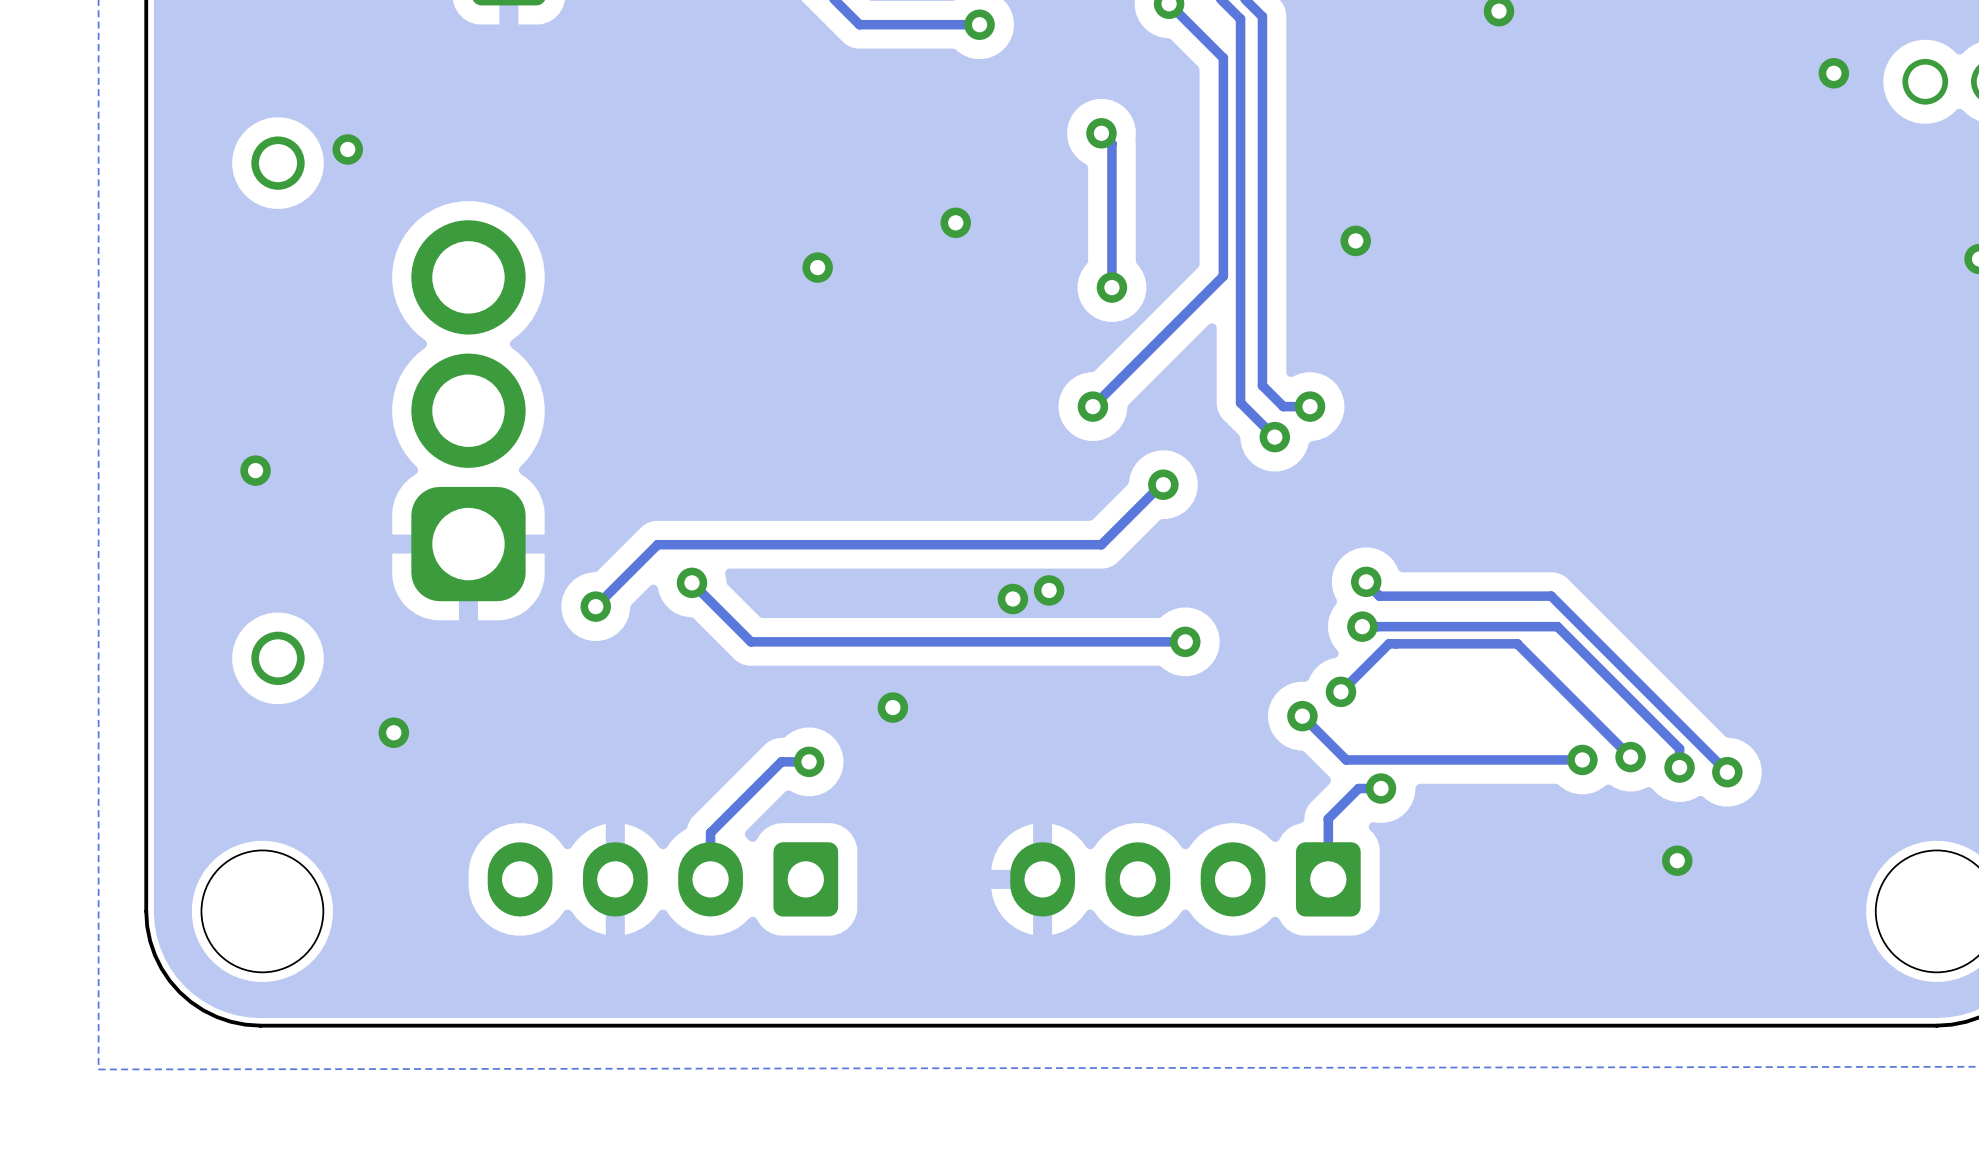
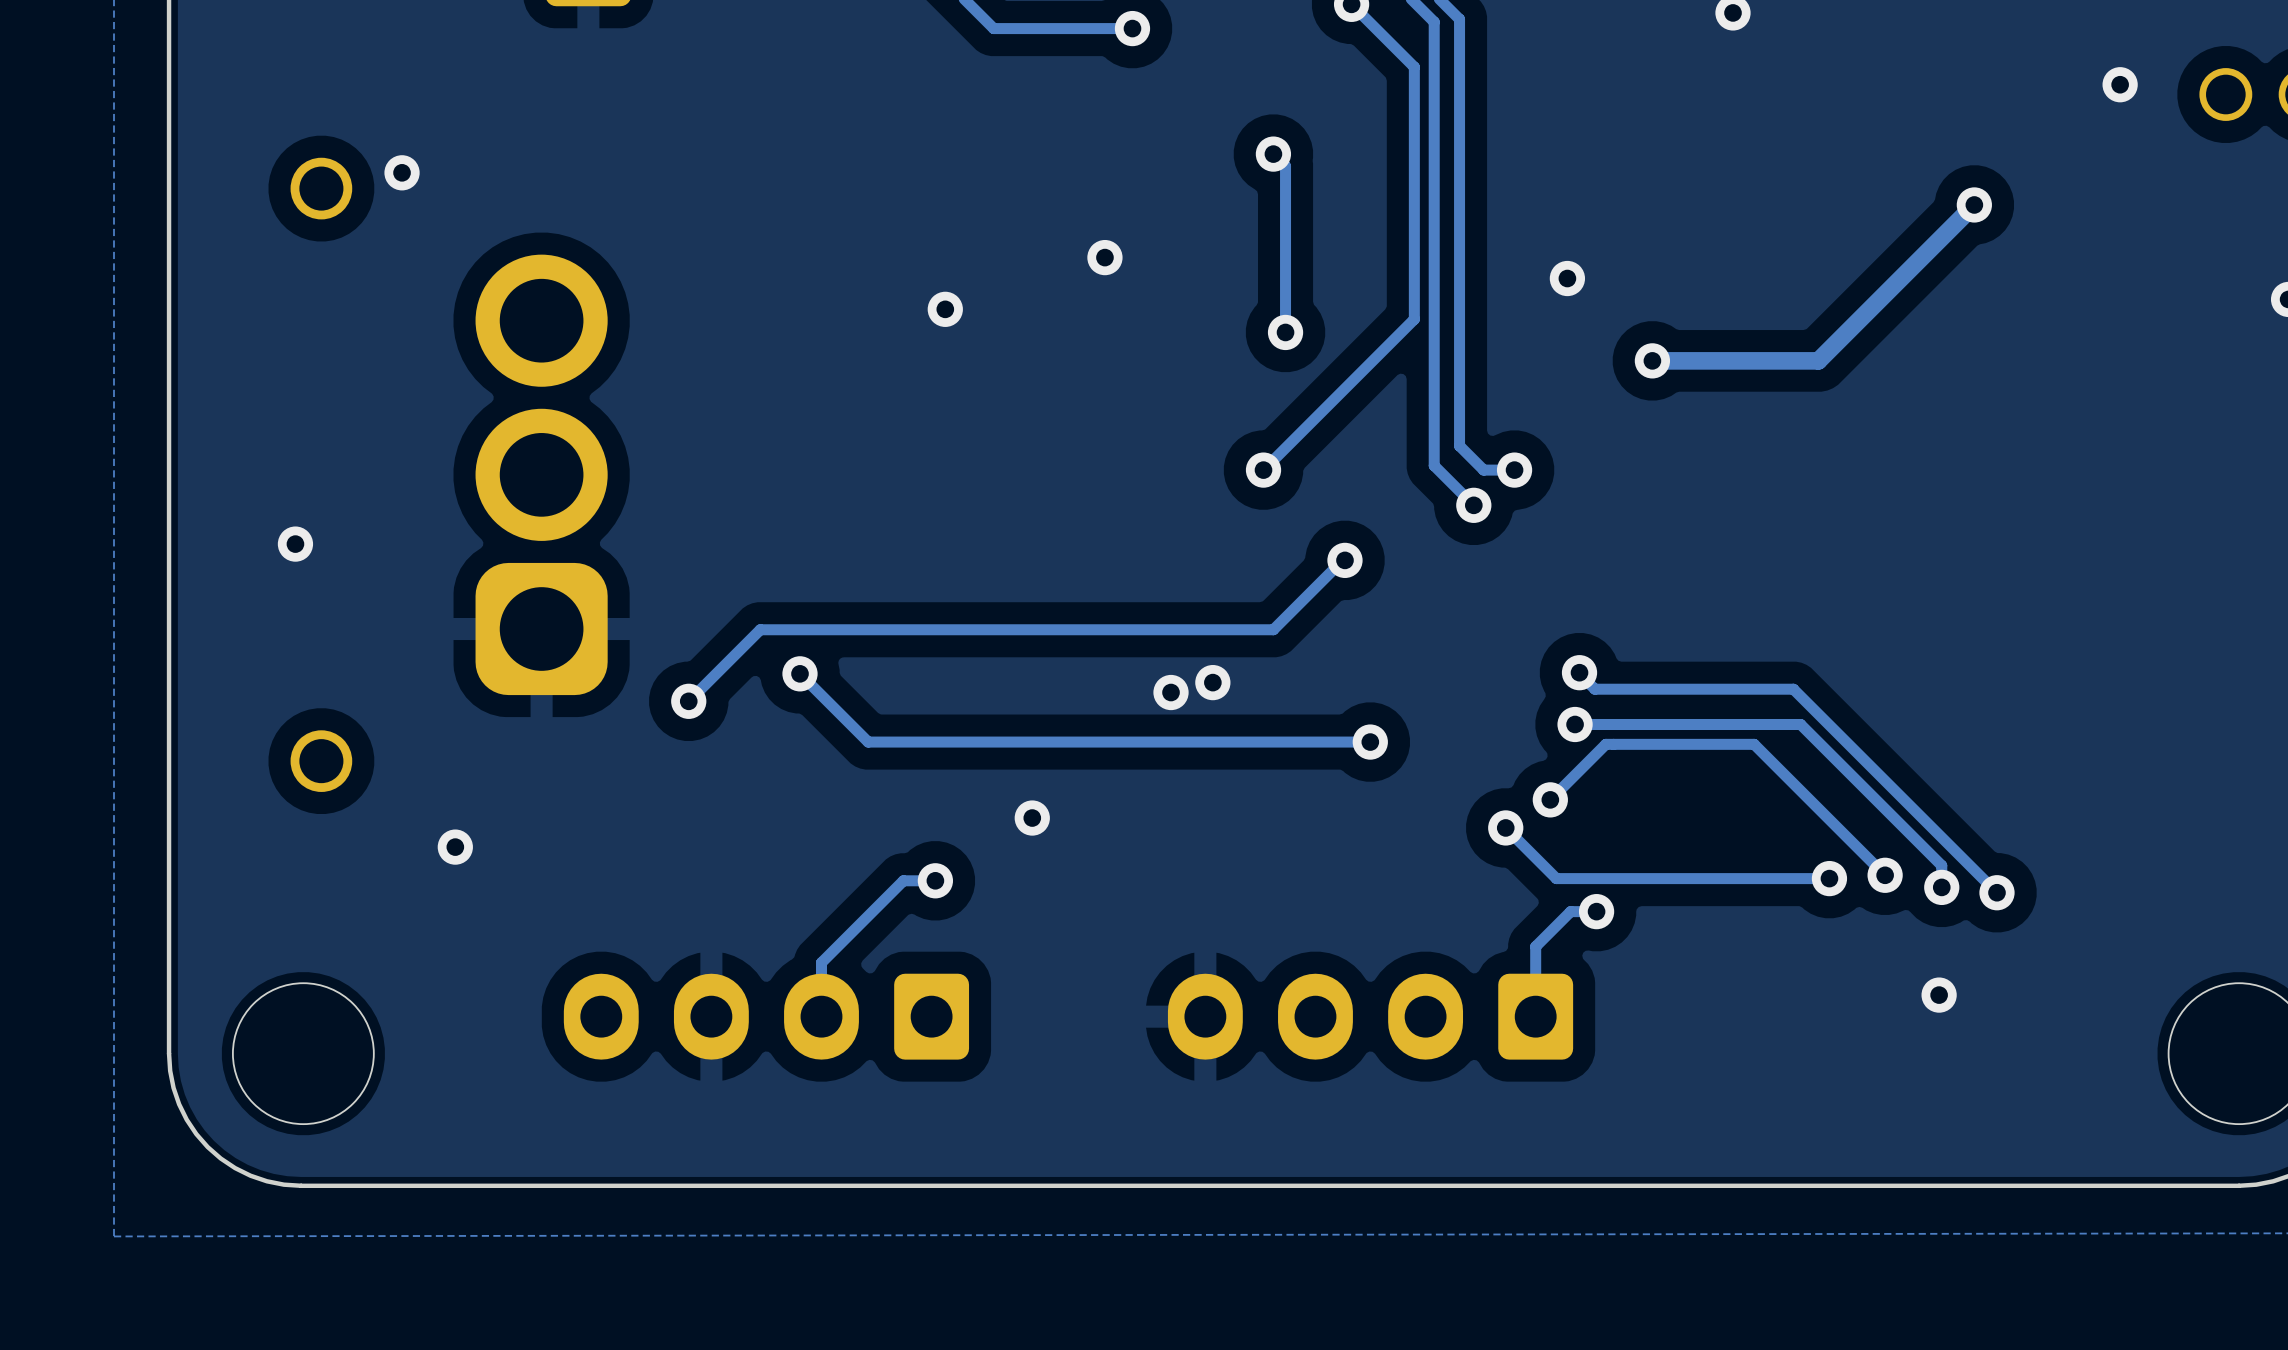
track: none -> (1974, 204) (1818, 360) (1652, 360)
via: none -> (1974, 204)
via: none -> (1652, 360)

